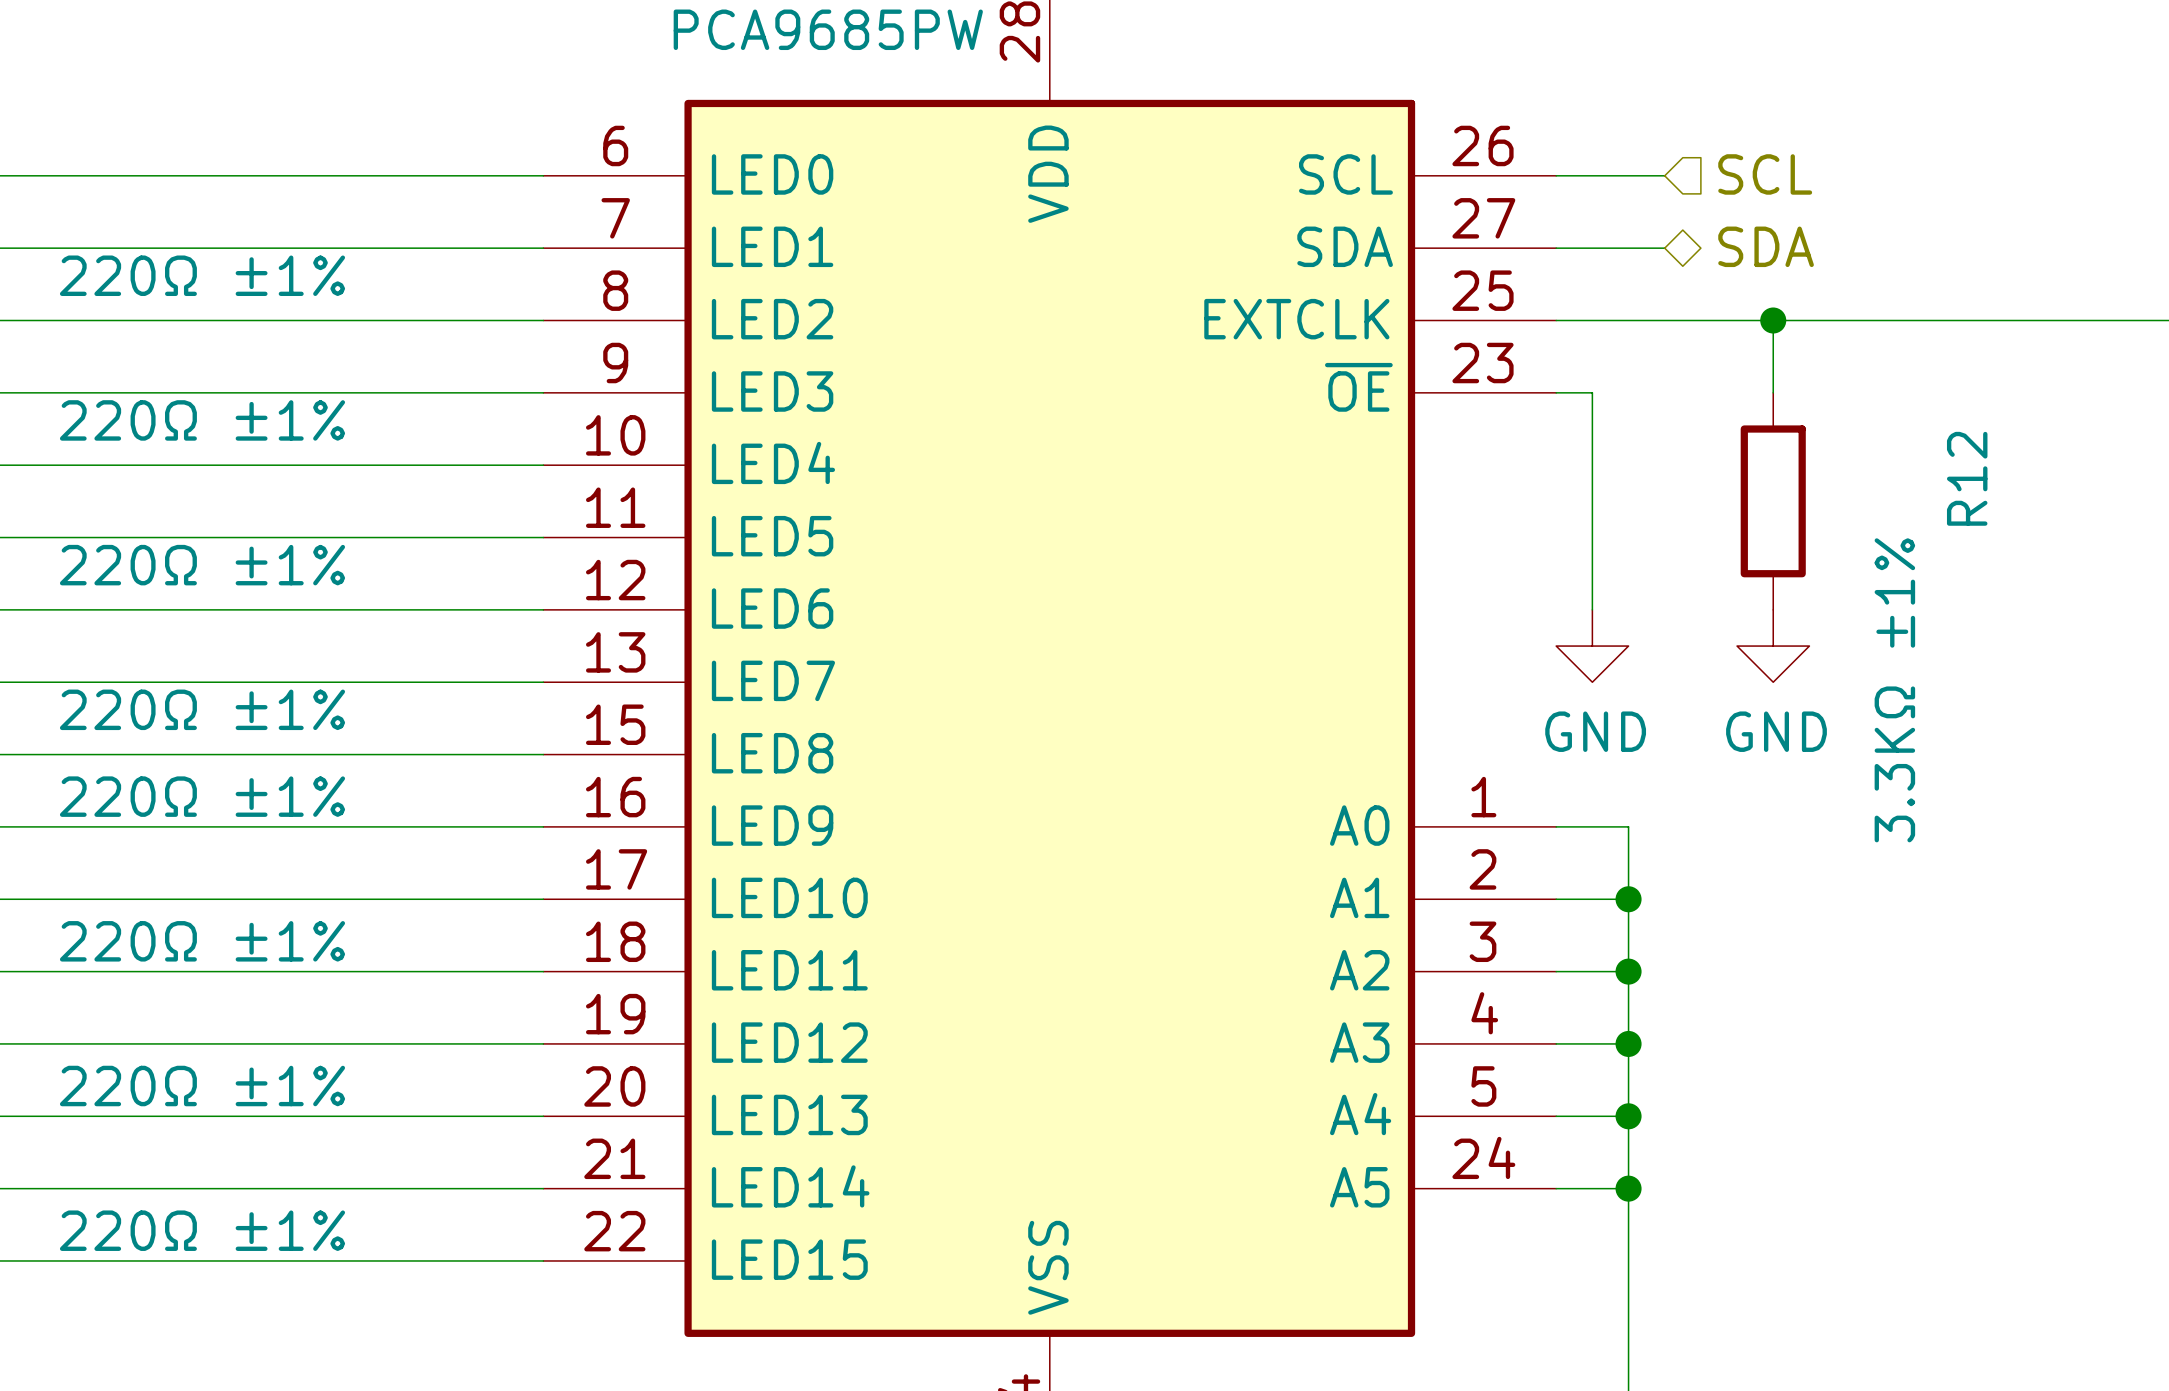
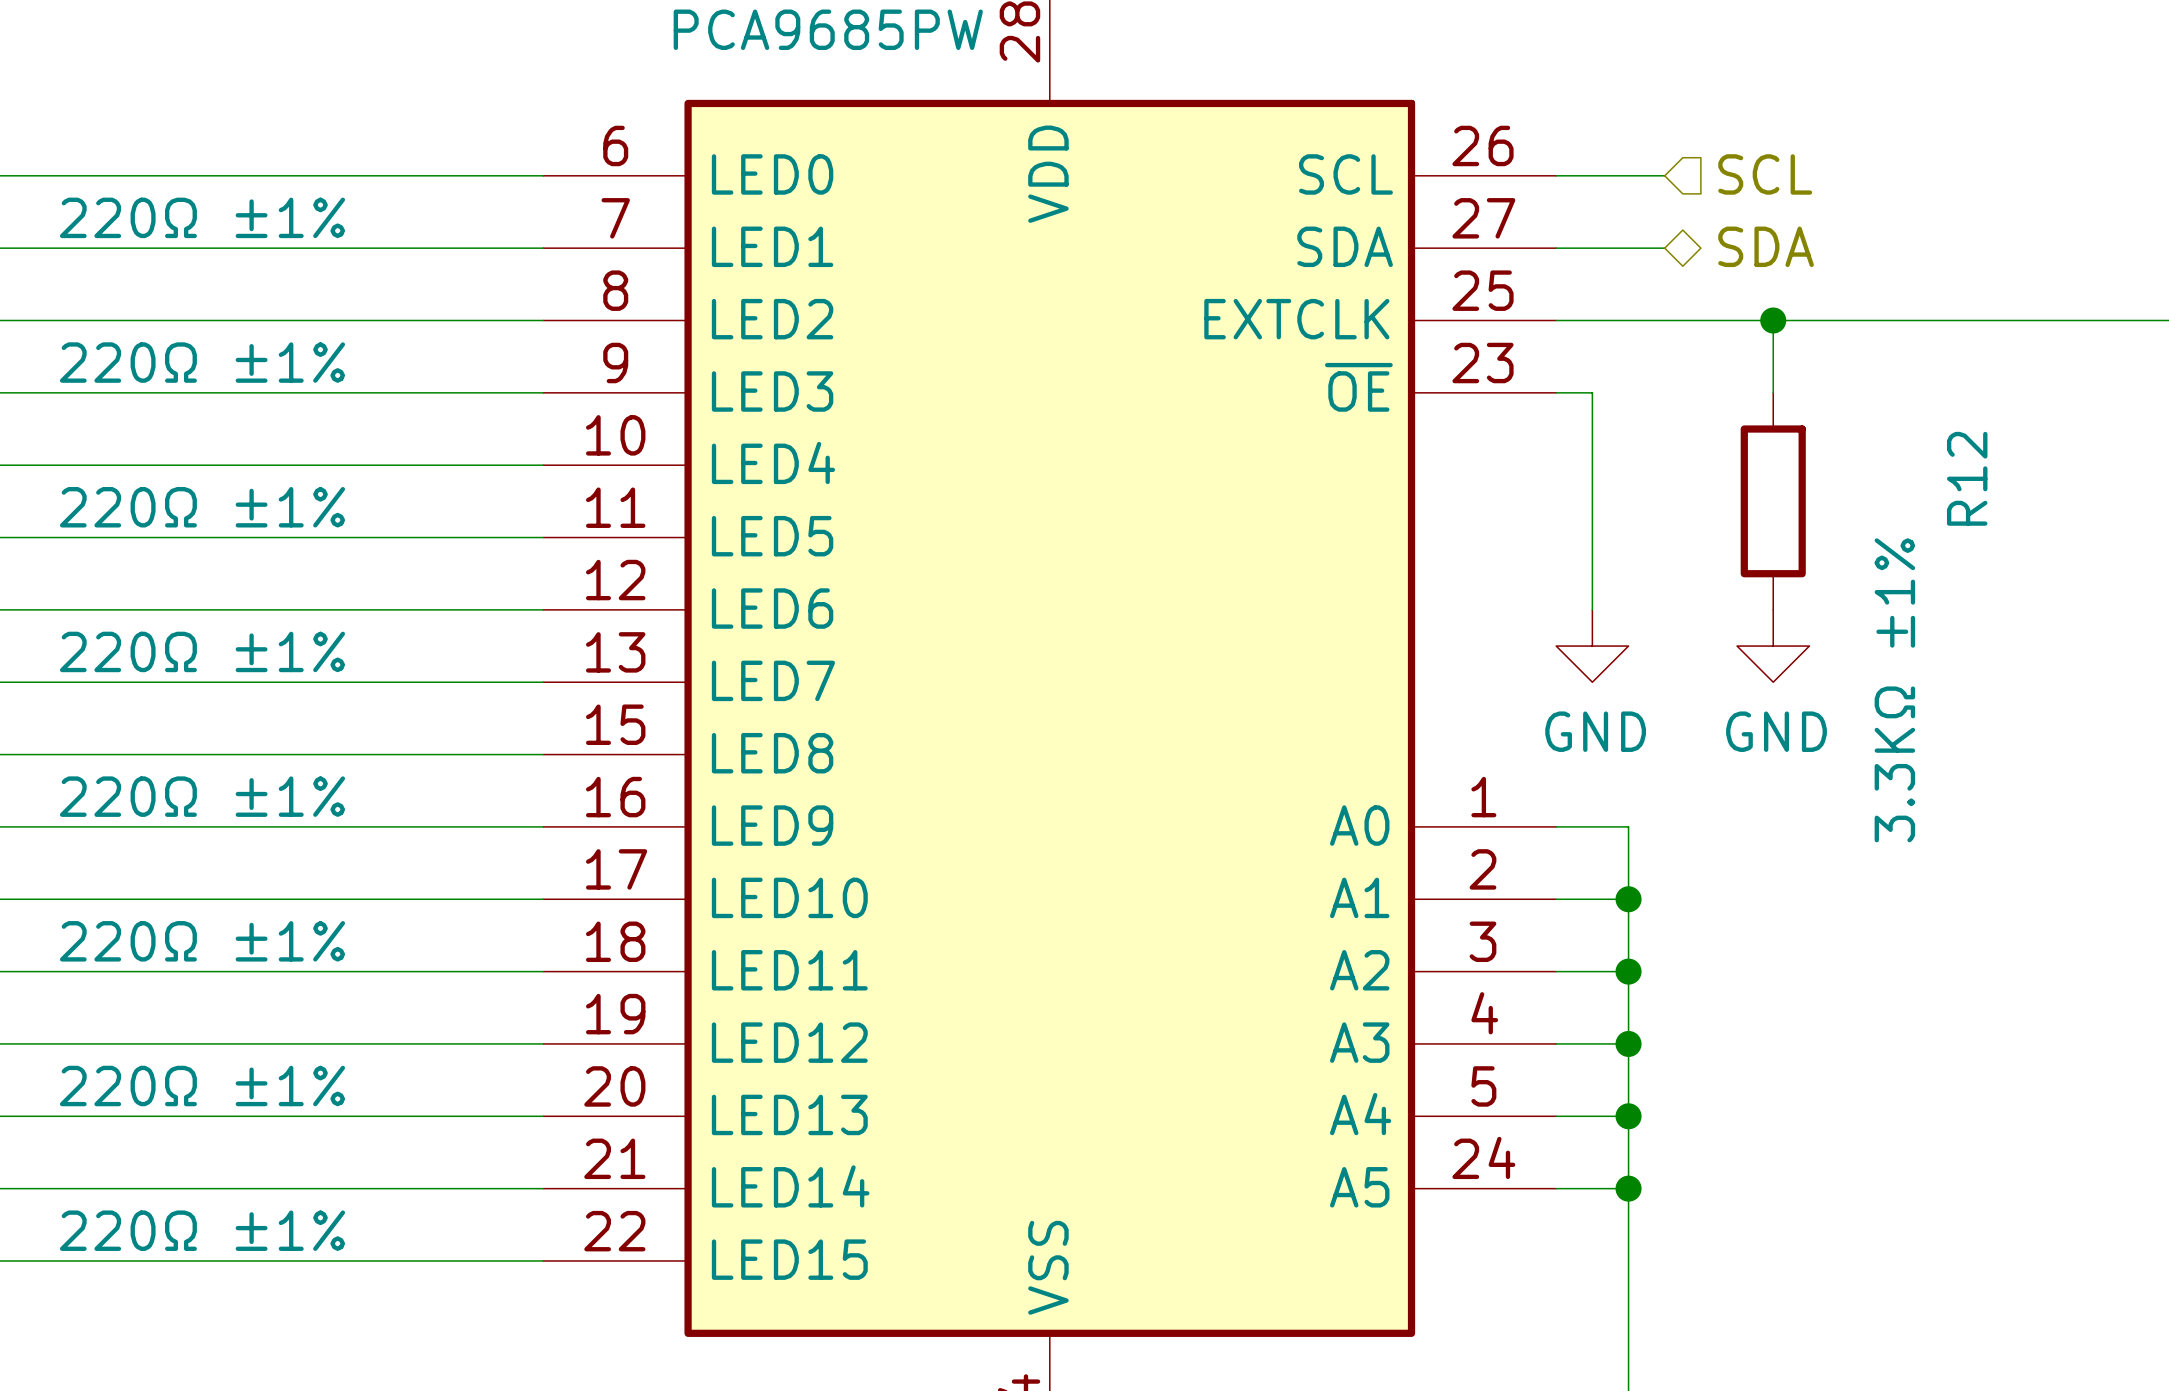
part value position: 220Ω ±1% (202, 275) -> 220Ω ±1% (202, 217)
part value position: 220Ω ±1% (202, 420) -> 220Ω ±1% (202, 362)
part value position: 220Ω ±1% (202, 565) -> 220Ω ±1% (202, 507)
part value position: 220Ω ±1% (202, 709) -> 220Ω ±1% (202, 651)

